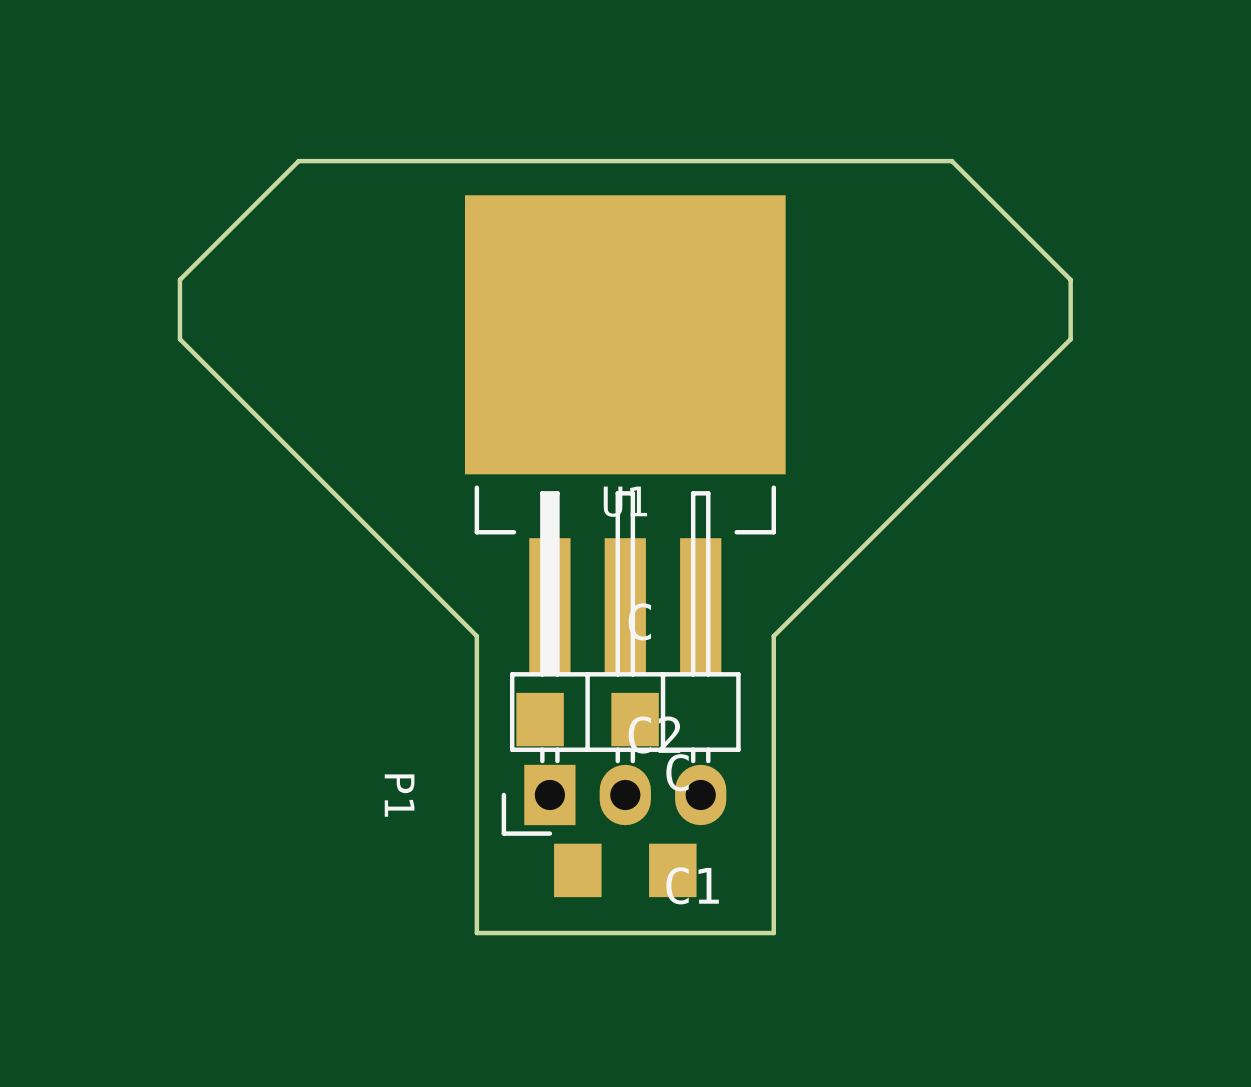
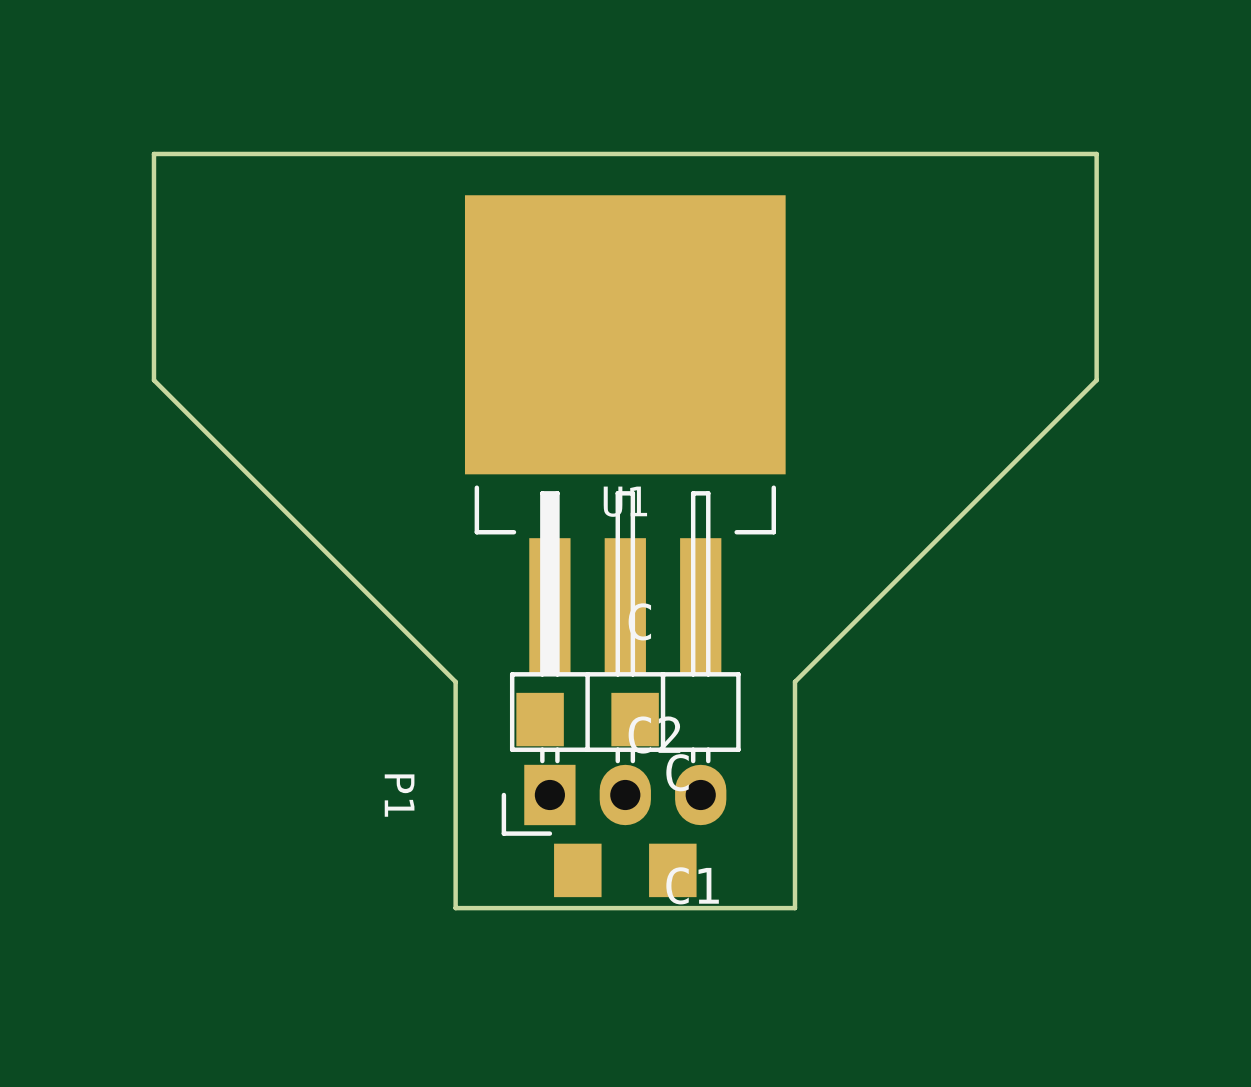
board edge: (951, 161) (1070, 279) (1070, 339) (773, 636) (773, 933) (476, 933) (476, 636) (179, 339) (179, 279) (298, 161) (951, 161) -> (1096, 153) (1096, 380) (794, 681) (794, 908) (455, 908) (455, 681) (153, 380) (153, 153) (1096, 153)

